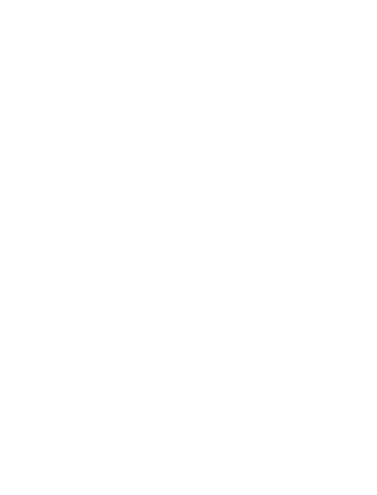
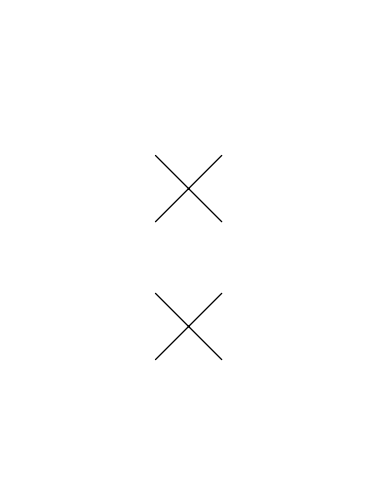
no-connect mark: none -> (188, 188)
no-connect mark: none -> (188, 326)

